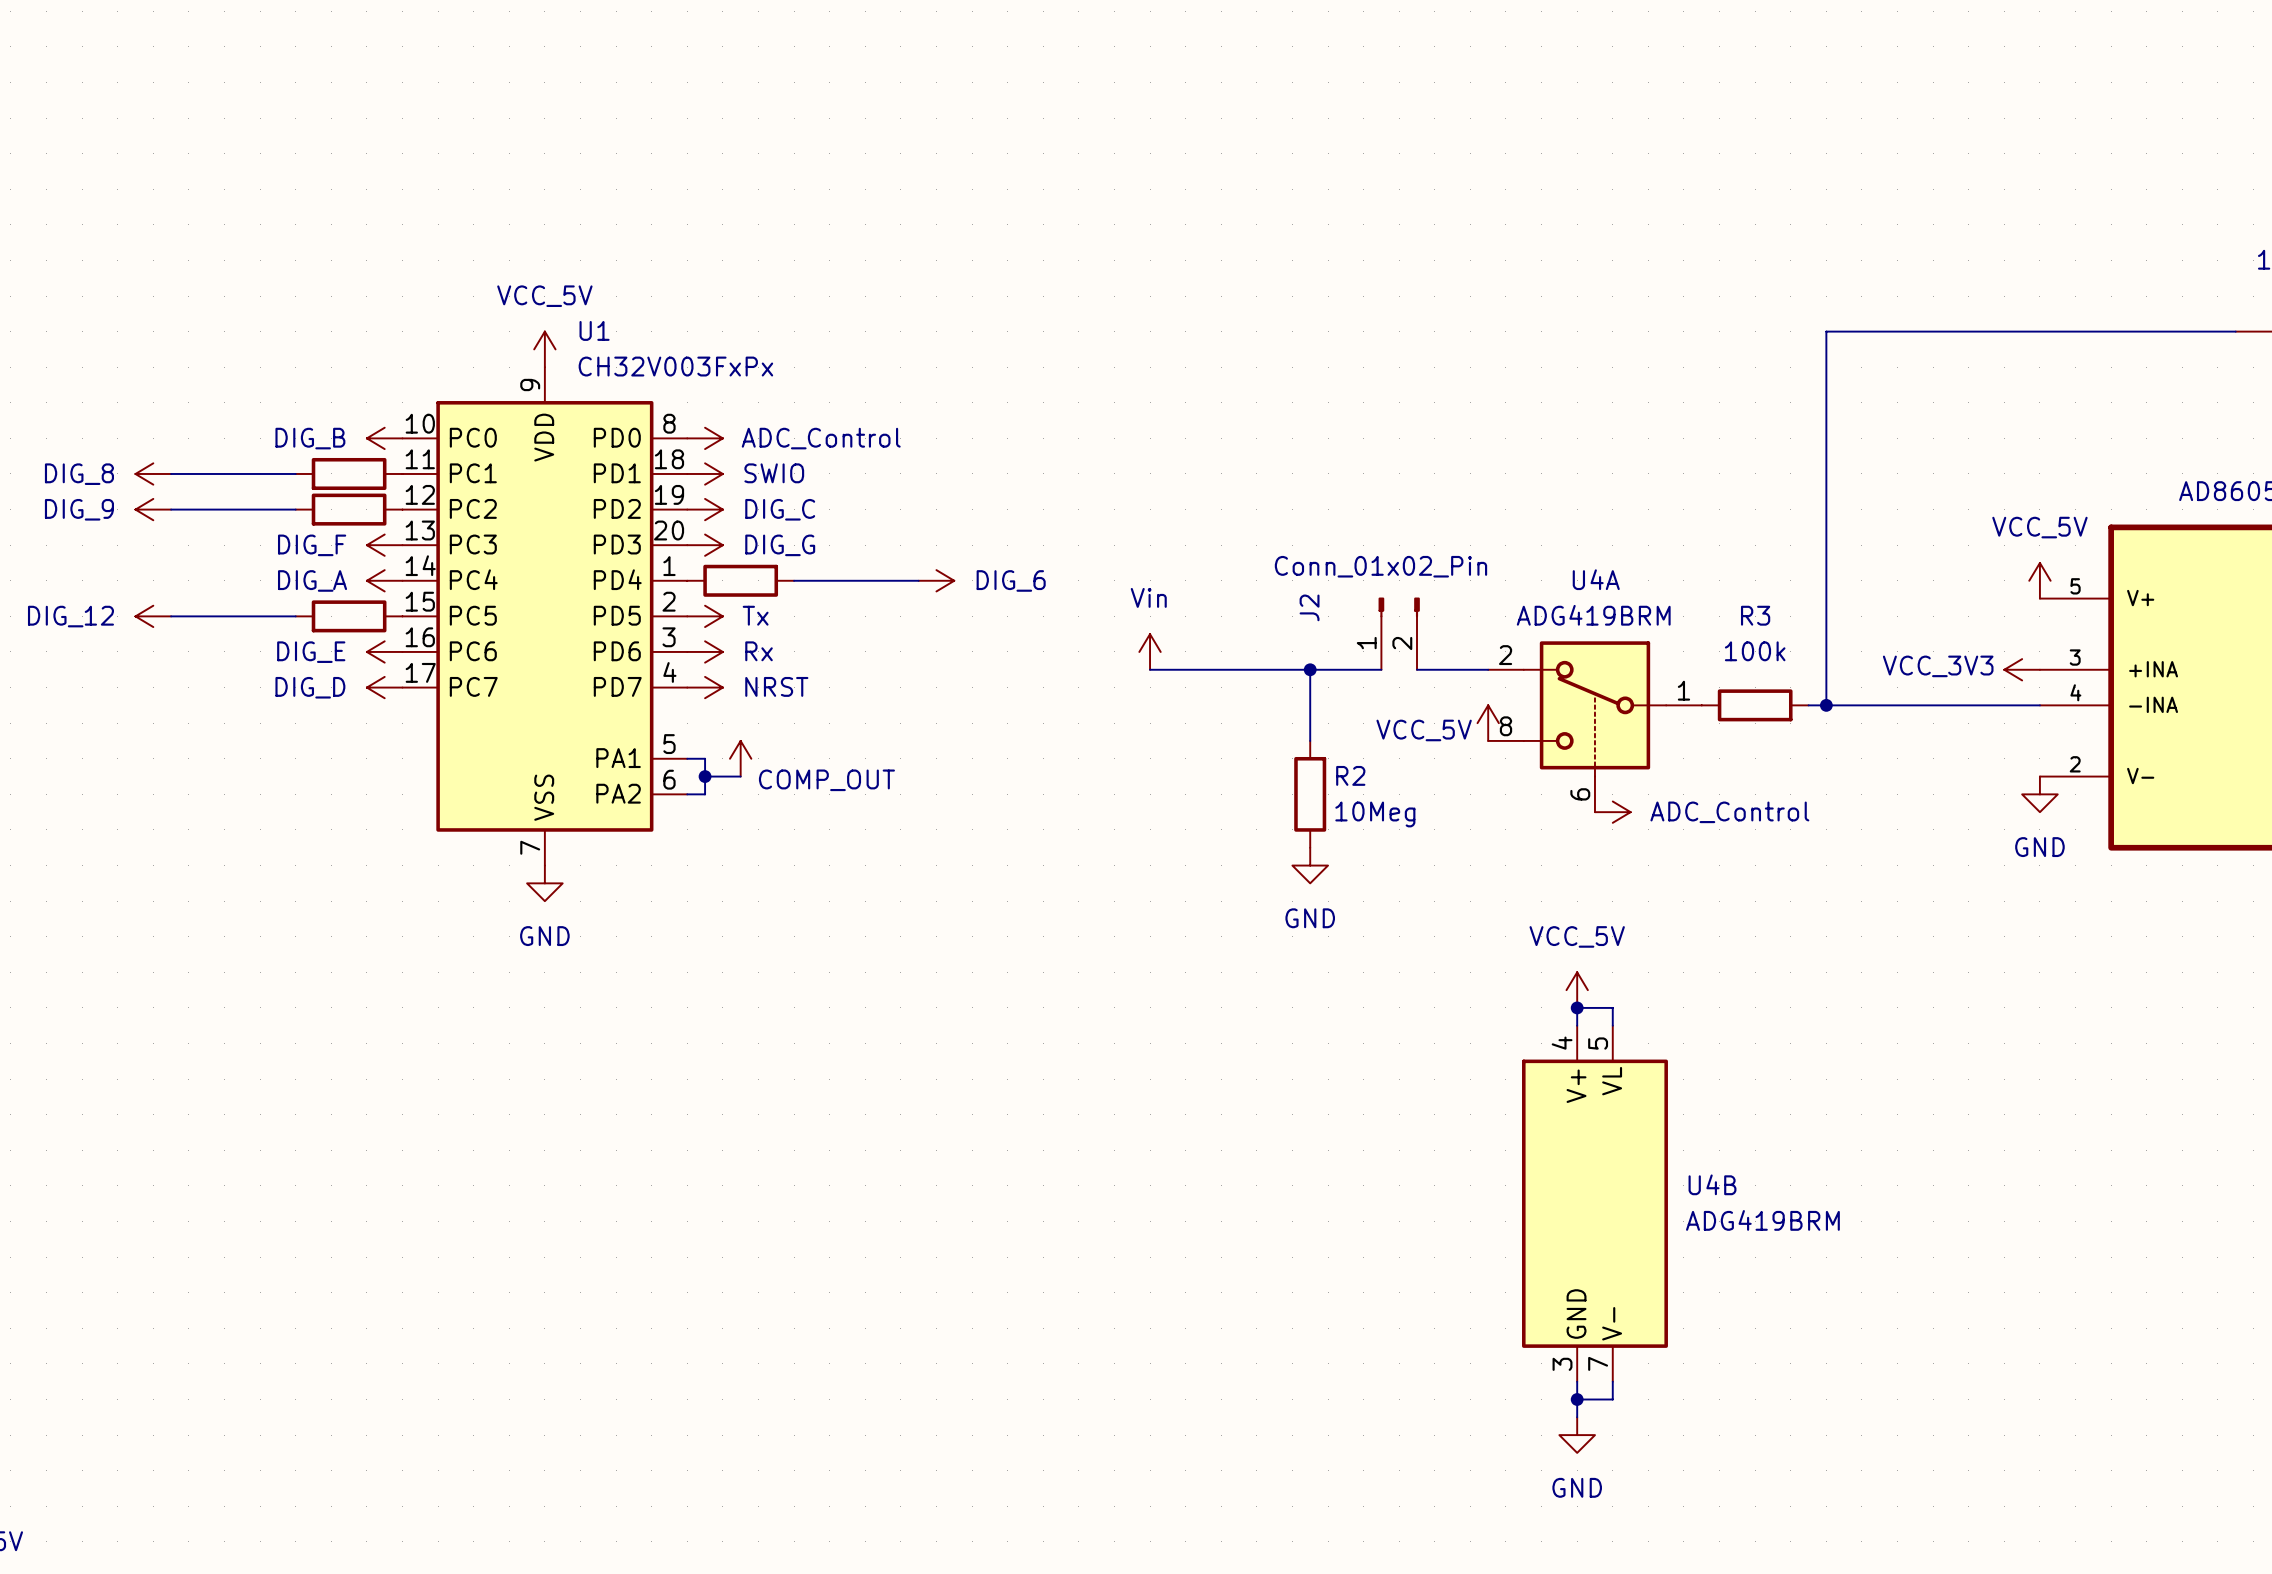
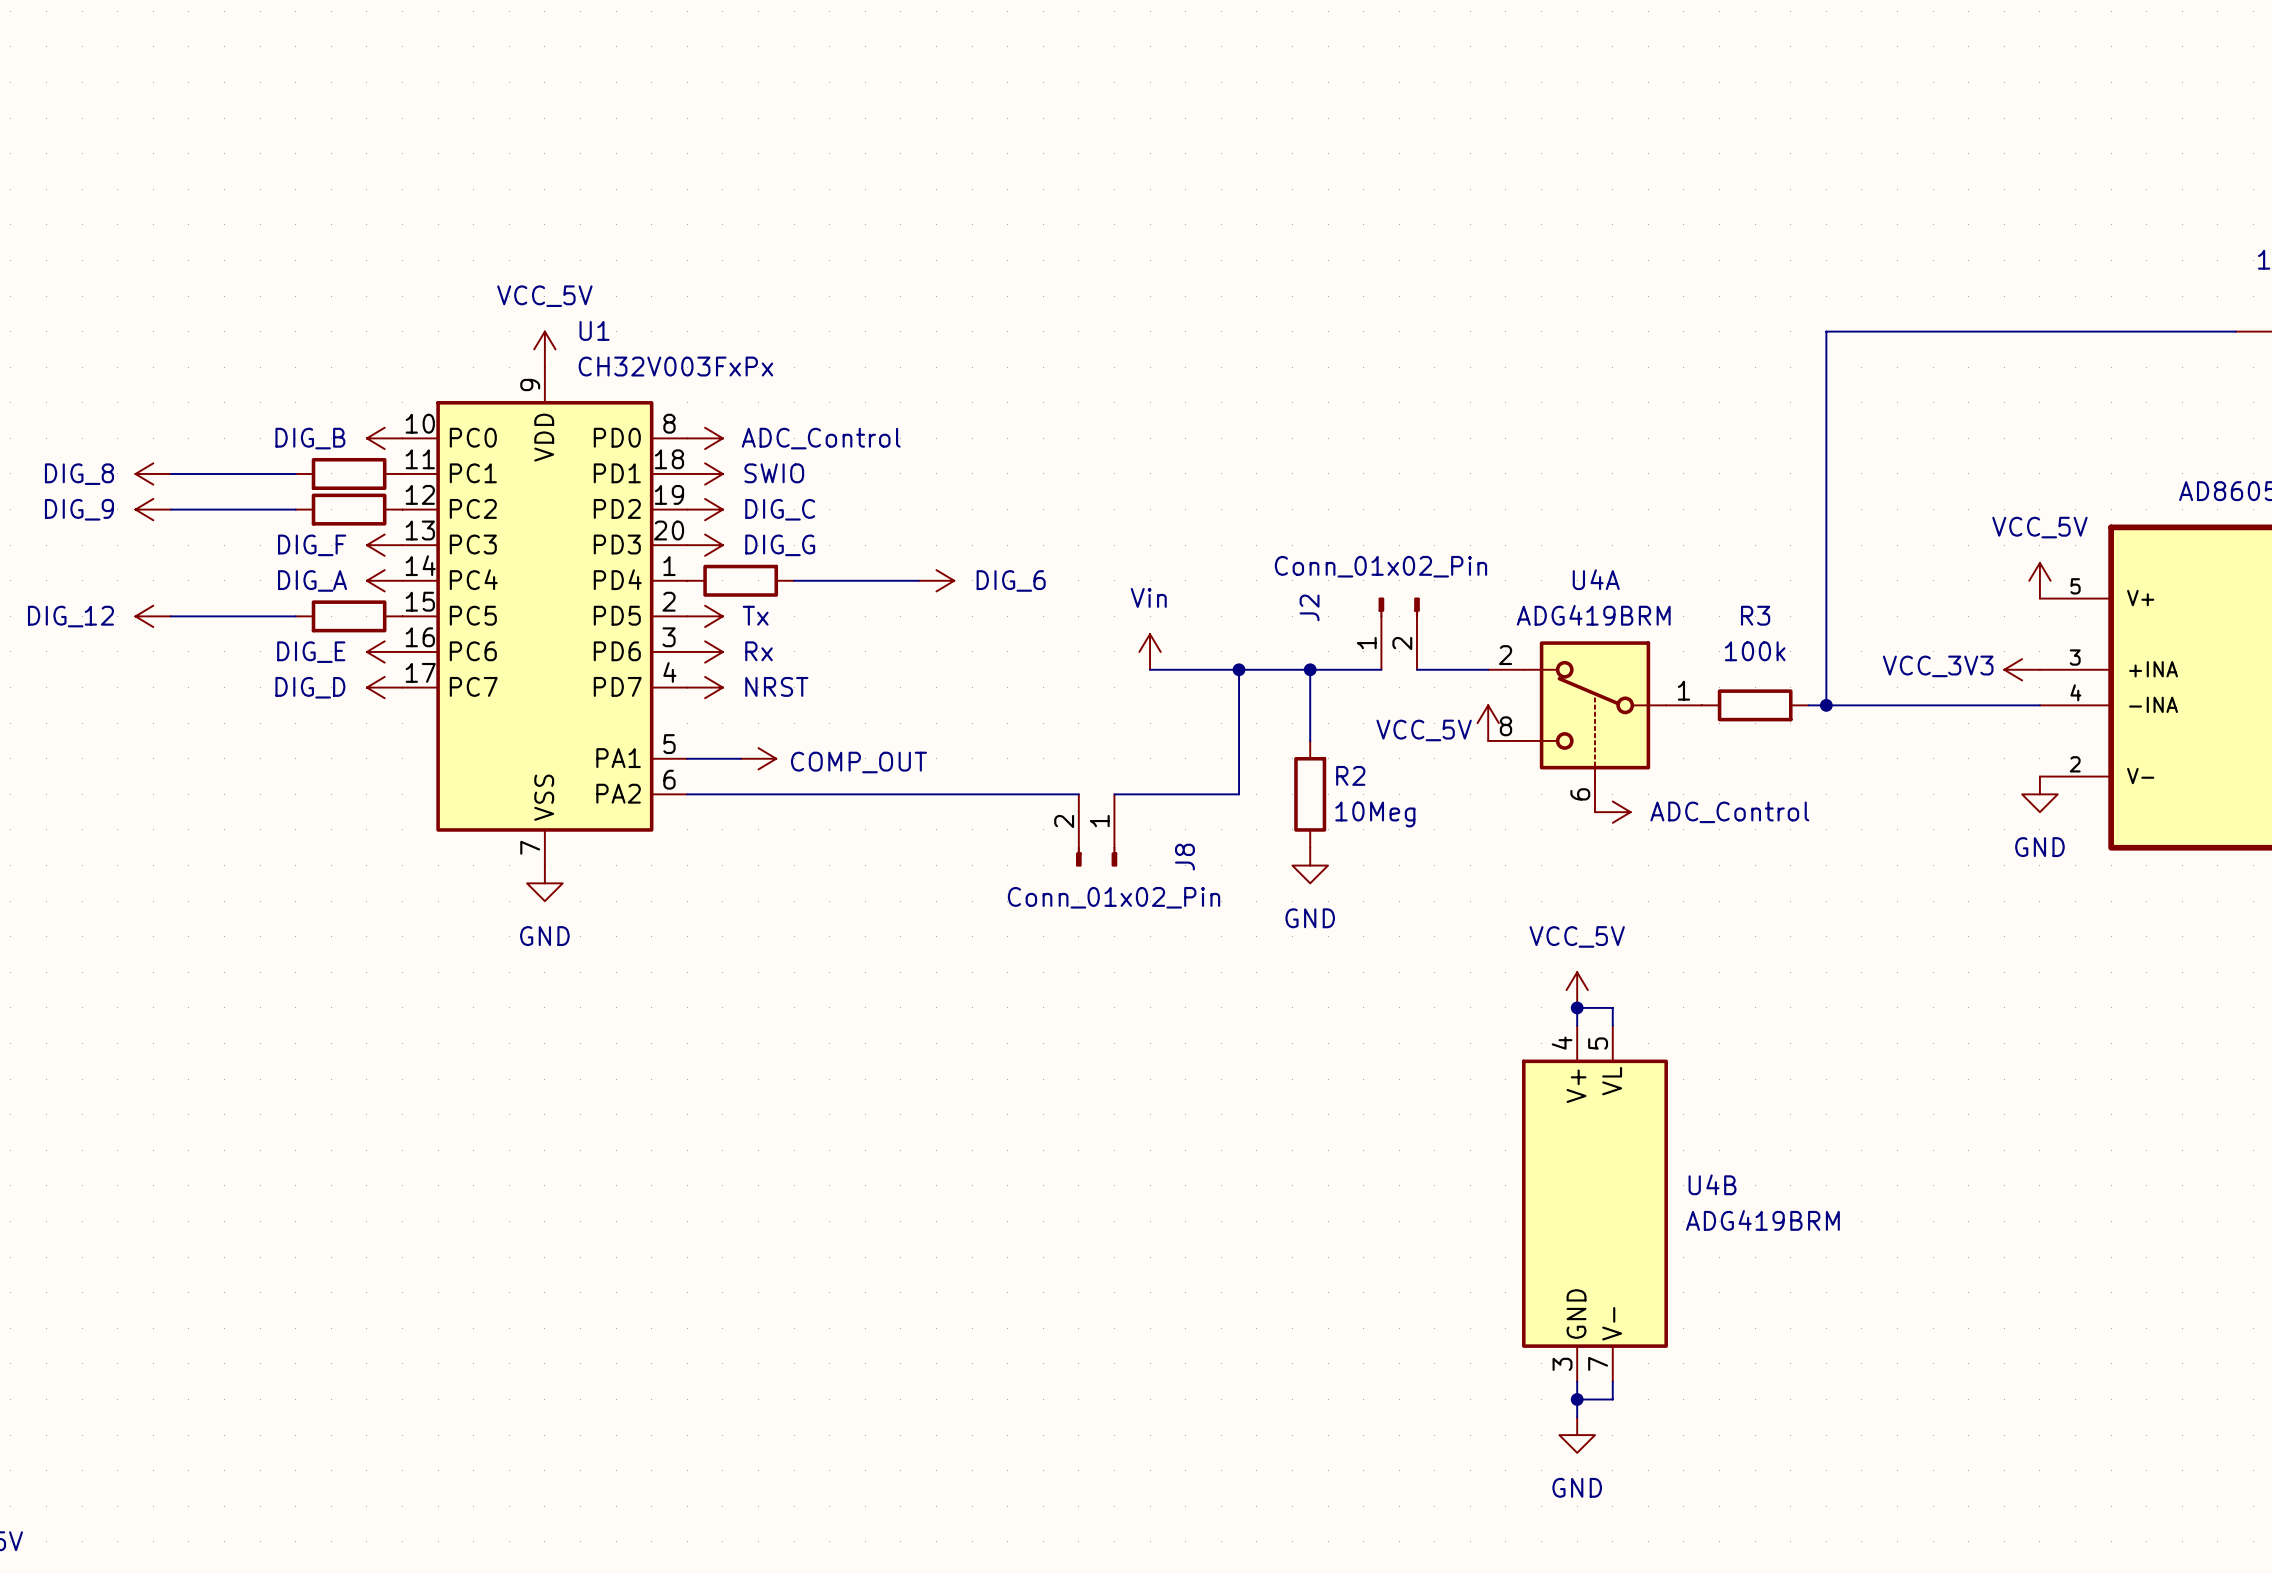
wire: none -> (1239, 669) (1239, 794) (1114, 794)
junction: none -> (1239, 669)
wire: (705, 758) (705, 794) -> (705, 758) (740, 758)
power symbol rotation: 0° (740, 758) -> 90° clockwise (758, 758)
wire: (705, 776) (740, 776) -> none
junction: (705, 776) -> none
wire: none -> (705, 794) (1078, 794)
J8: none -> Conn_01x02_Pin (1096, 830)

